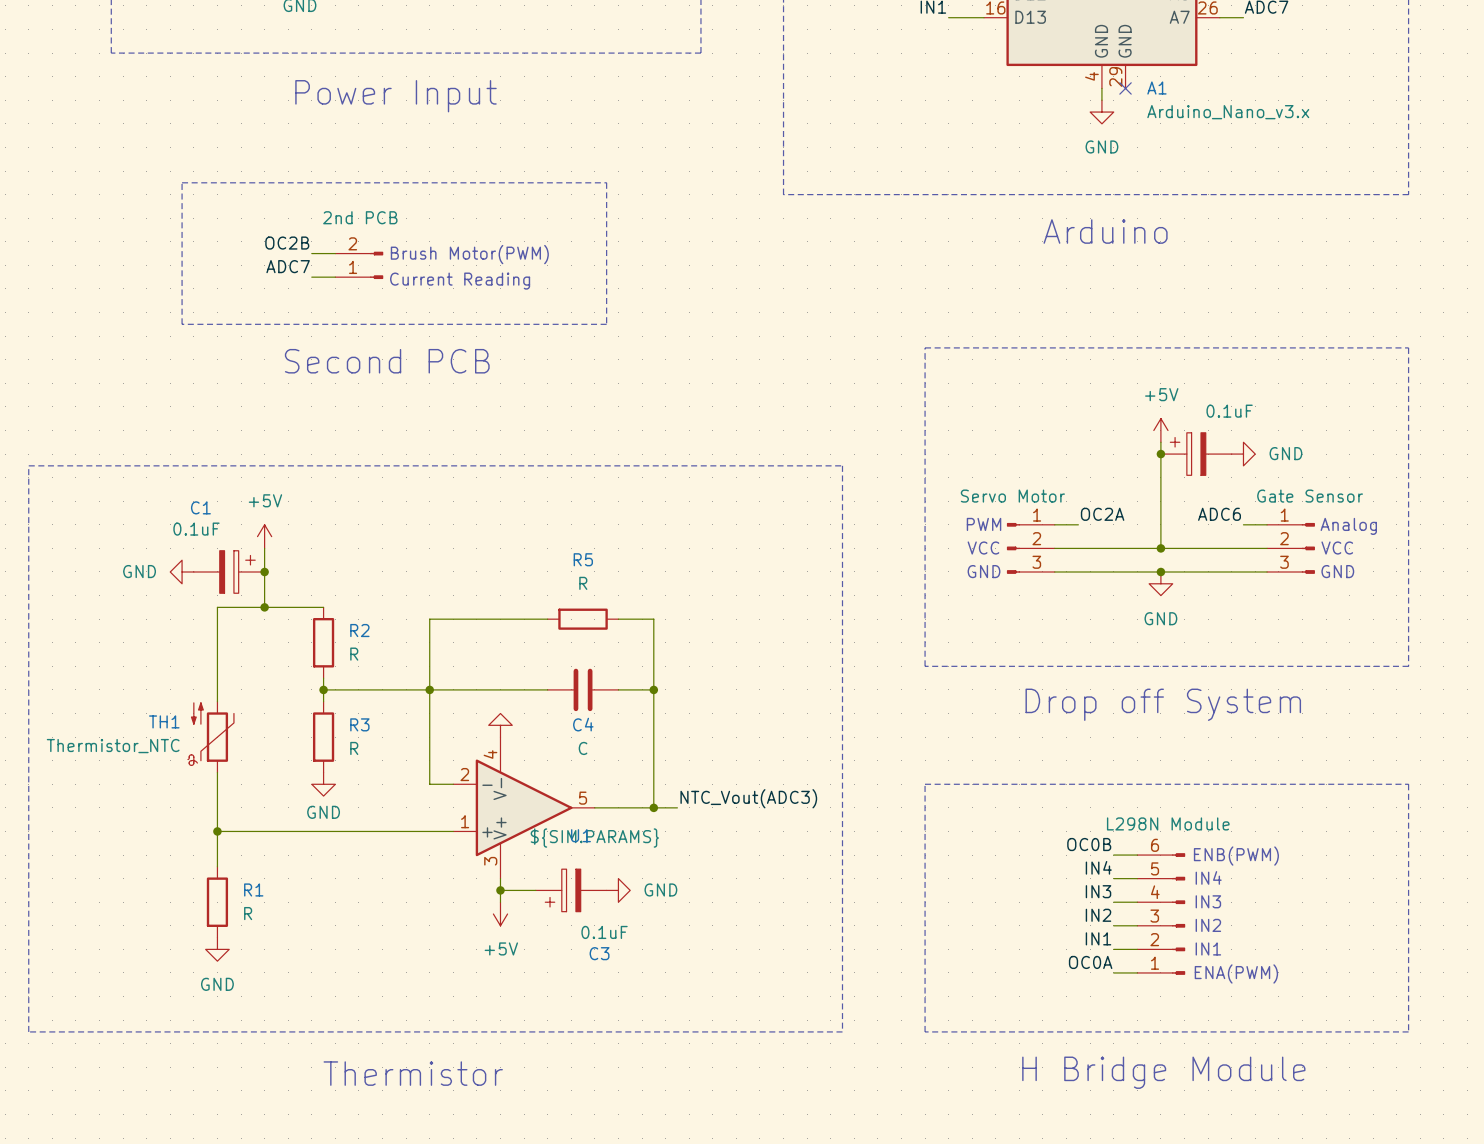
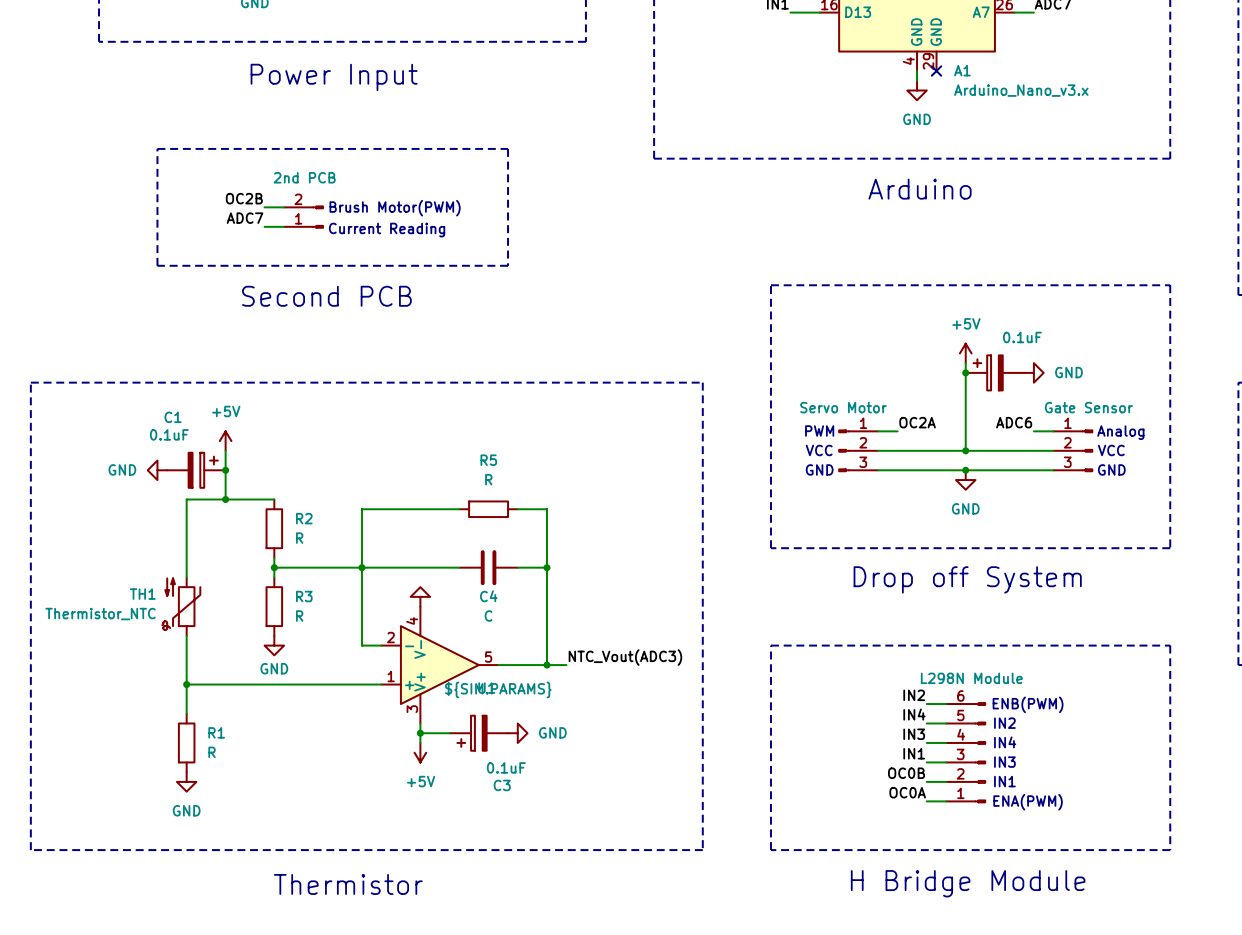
label: OC0B (1089, 844) -> IN2 (914, 695)
text: IN4 (1208, 877) -> IN2 (1004, 723)
text: IN3 (1208, 901) -> IN4 (1005, 742)
label: IN2 (1098, 915) -> IN1 (914, 753)
text: IN2 (1208, 925) -> IN3 (1004, 762)
label: IN1 (1098, 938) -> OC0B (906, 773)

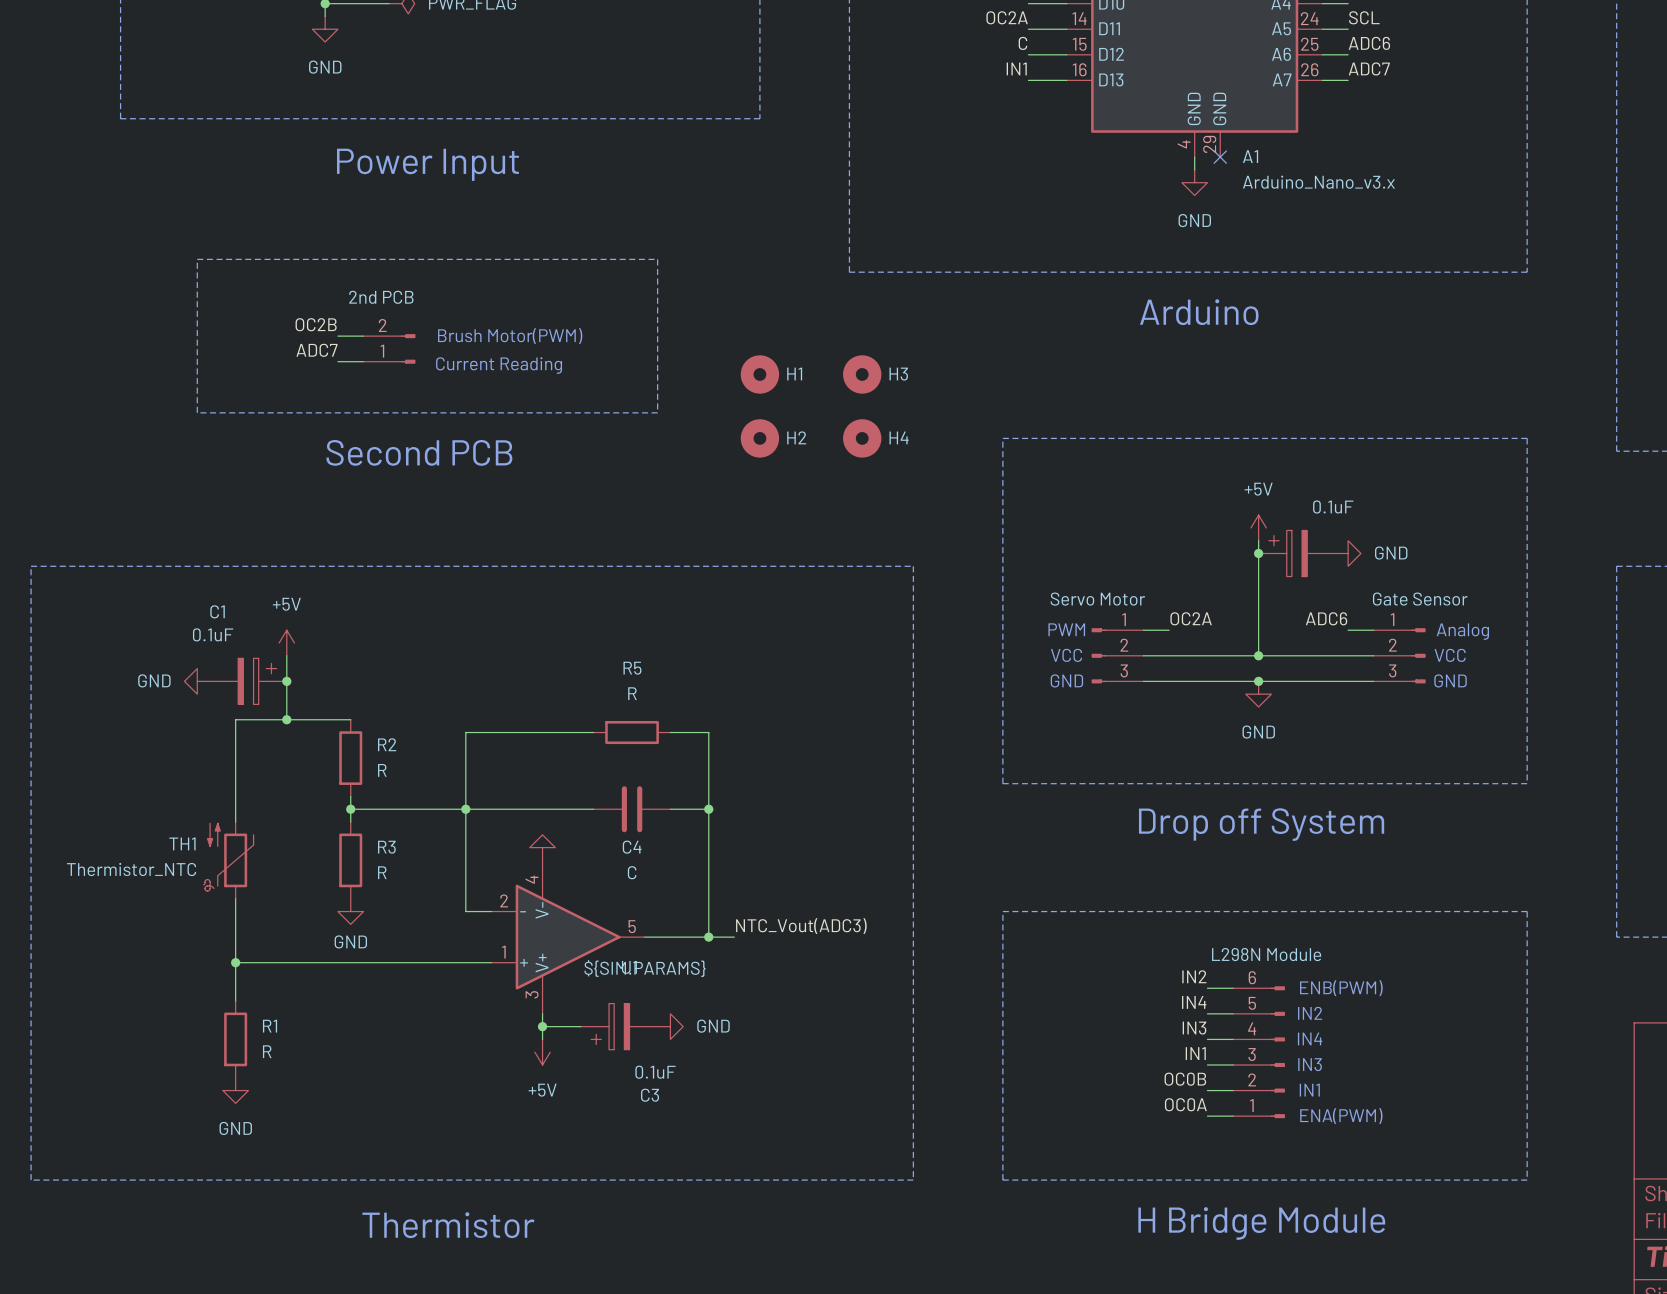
H1: none -> (759, 374)
H3: none -> (862, 374)
H2: none -> (759, 438)
H4: none -> (862, 438)

